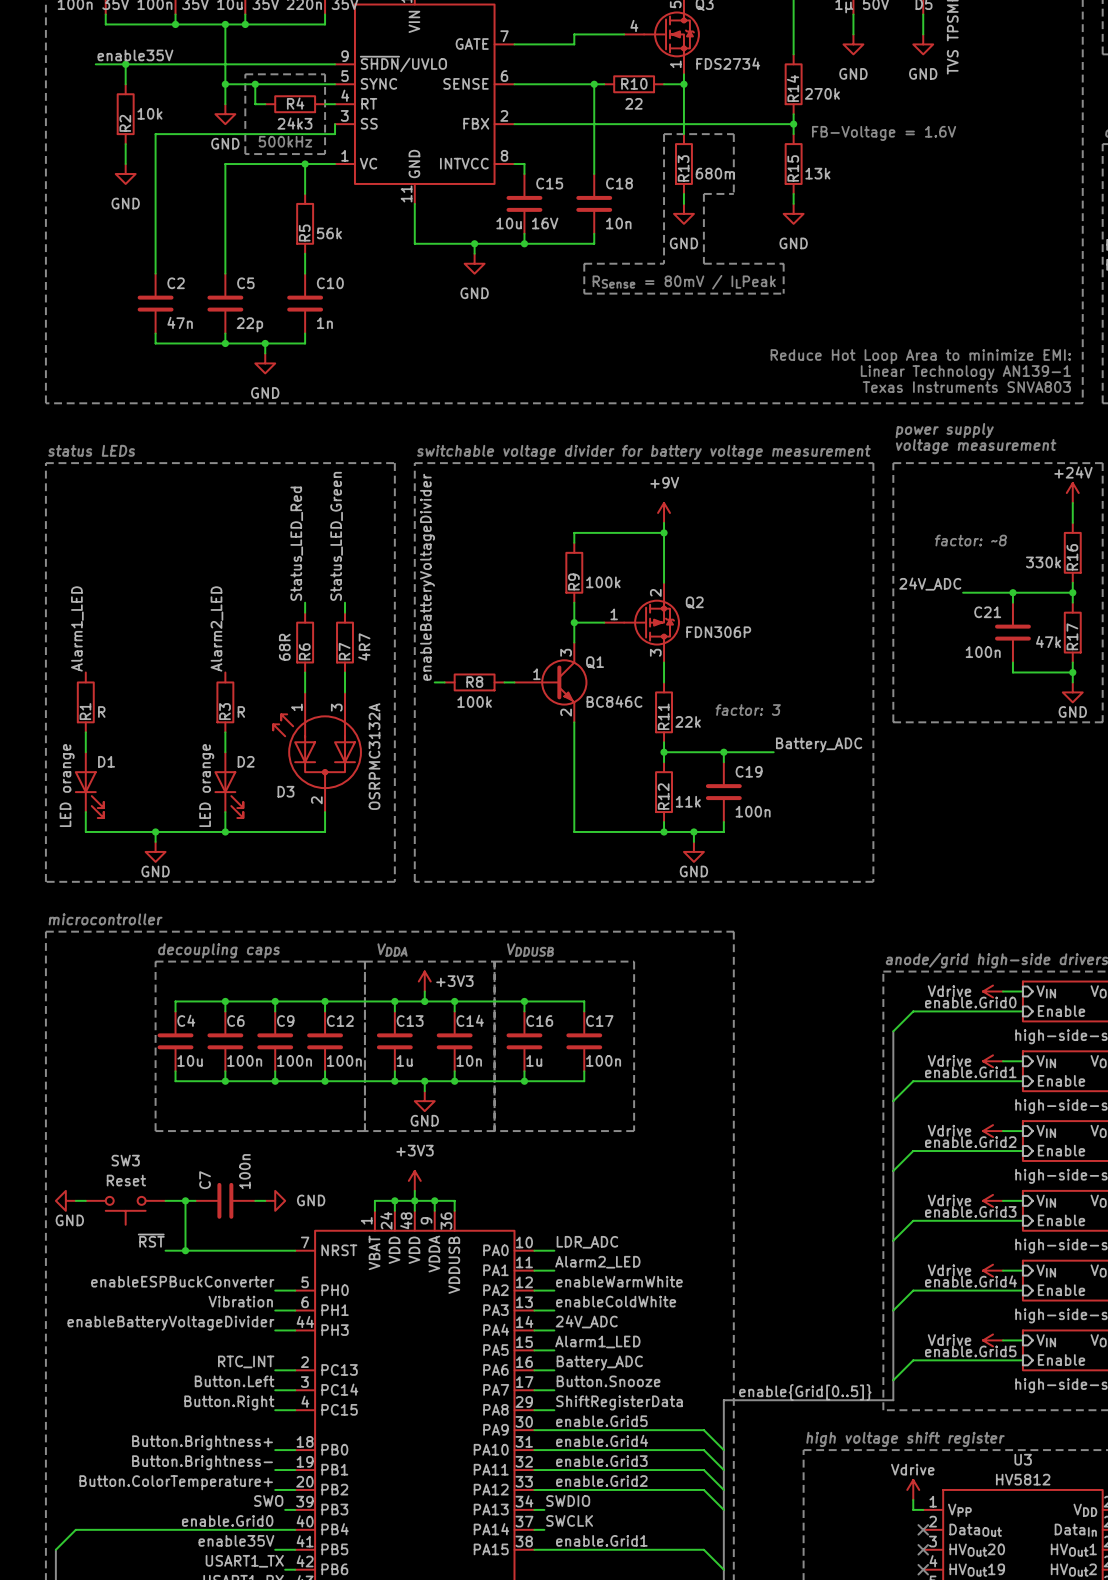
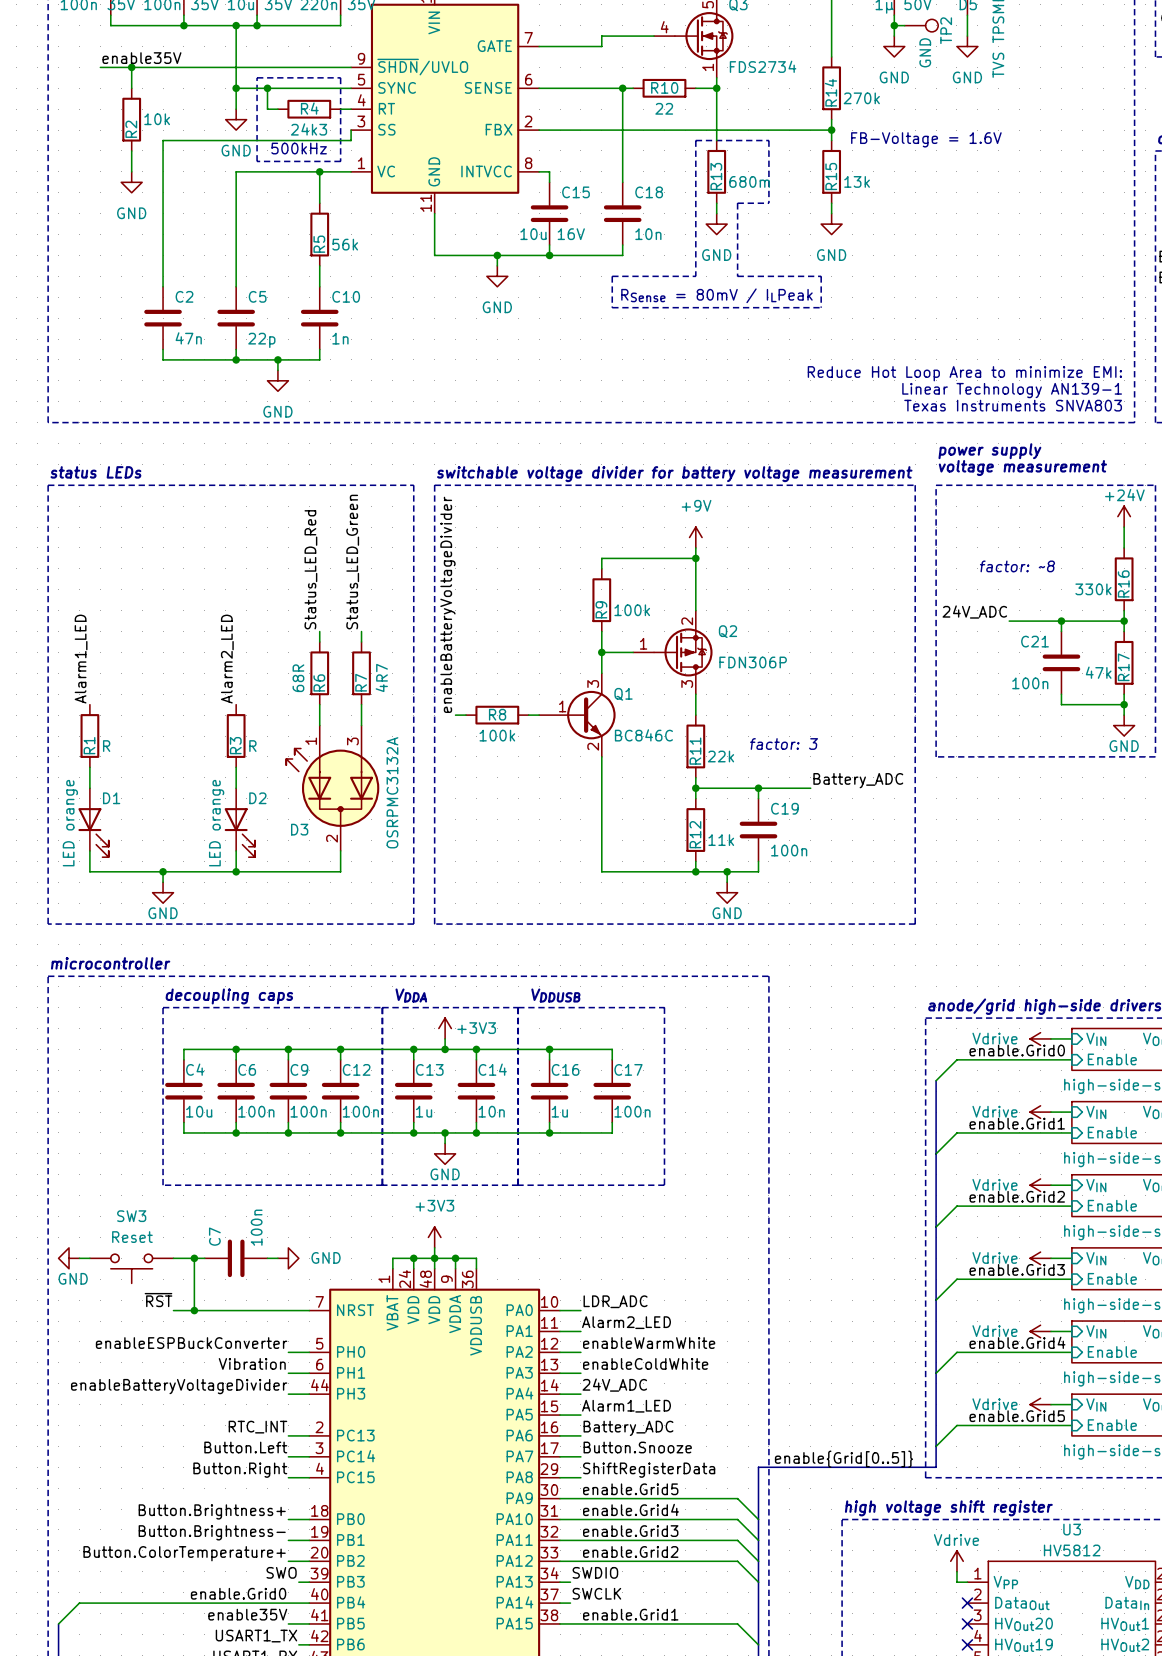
wire: none -> (894, 25) (904, 25)
junction: none -> (894, 25)
TP2: none -> GND (921, 25)

